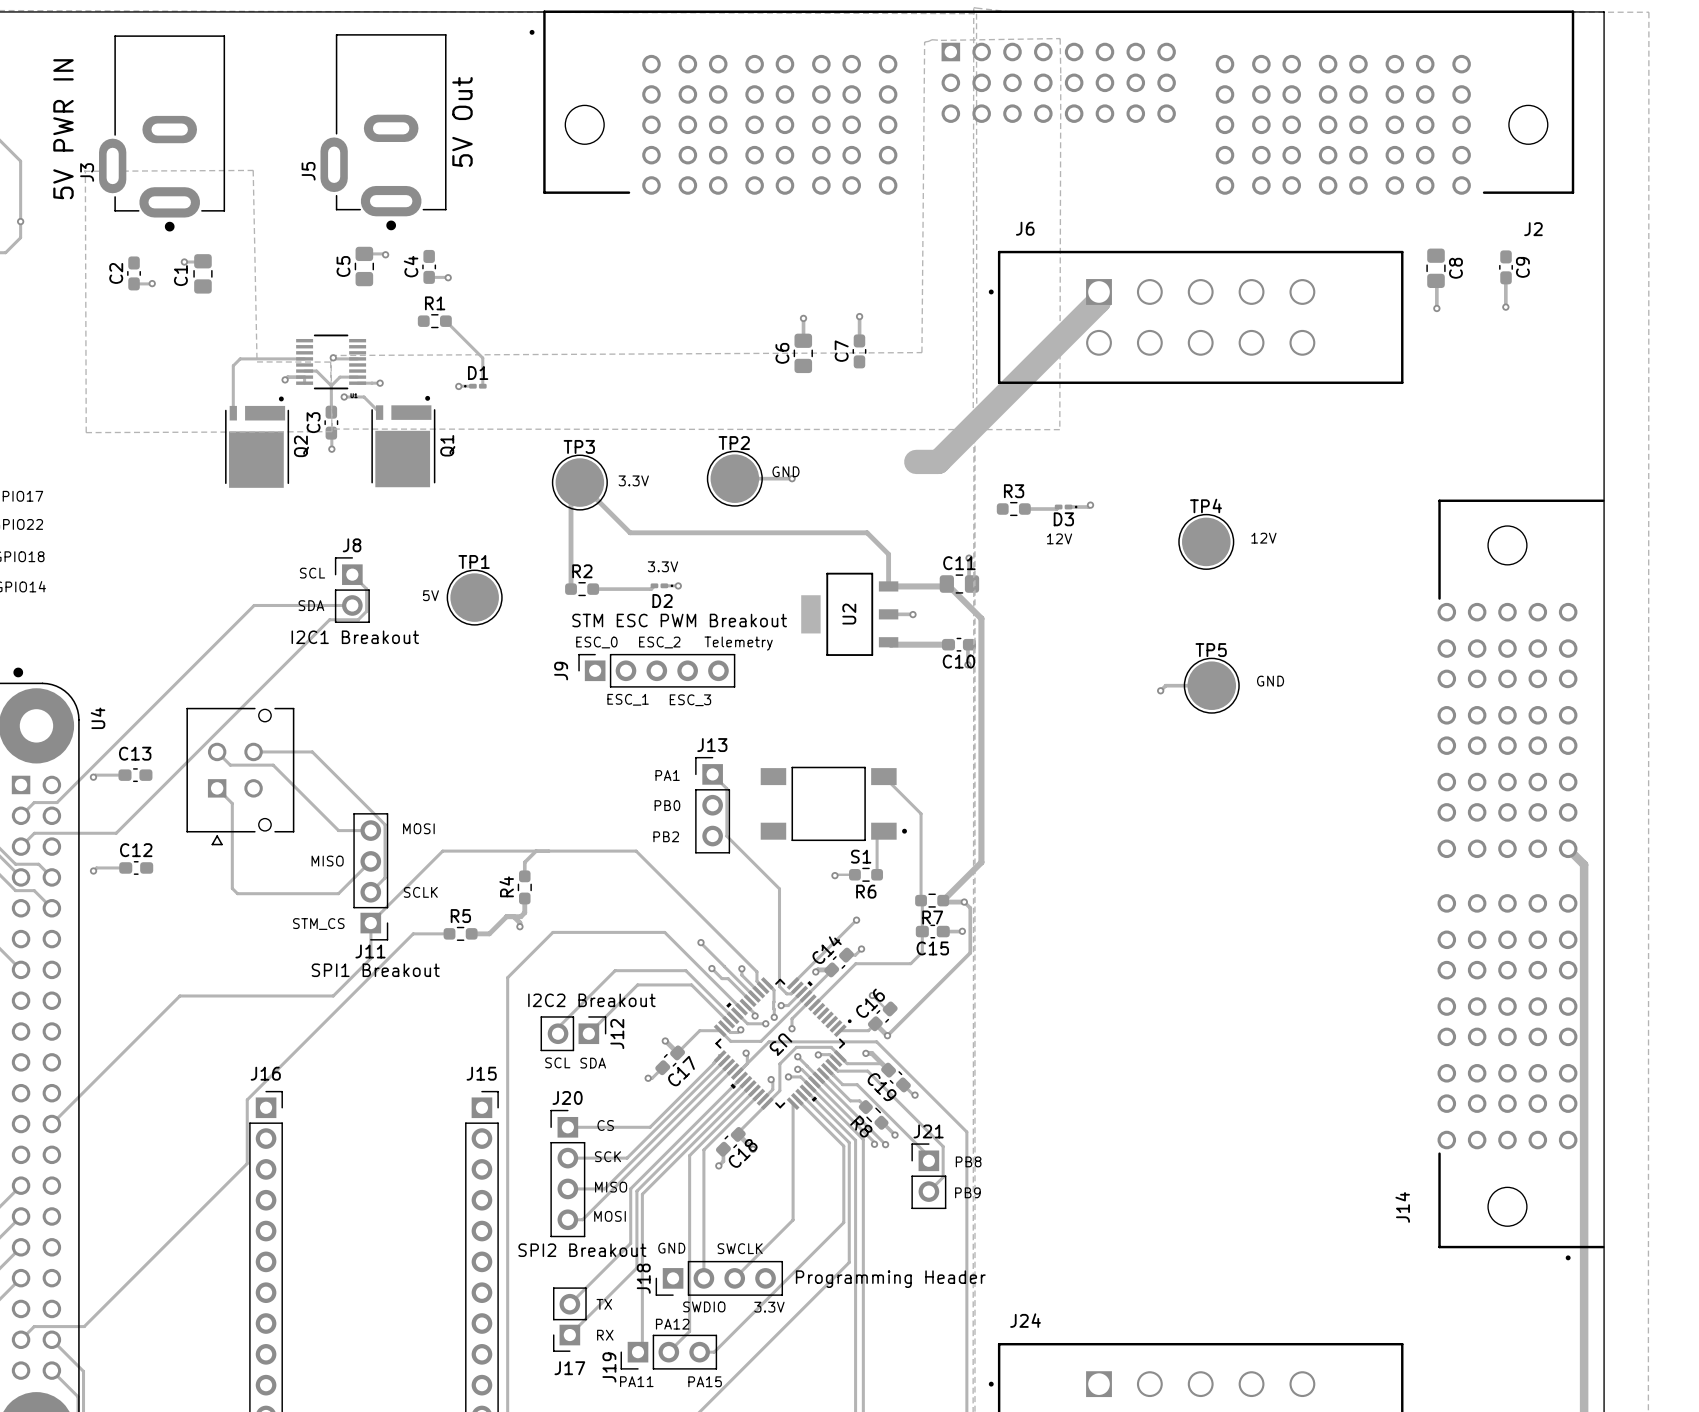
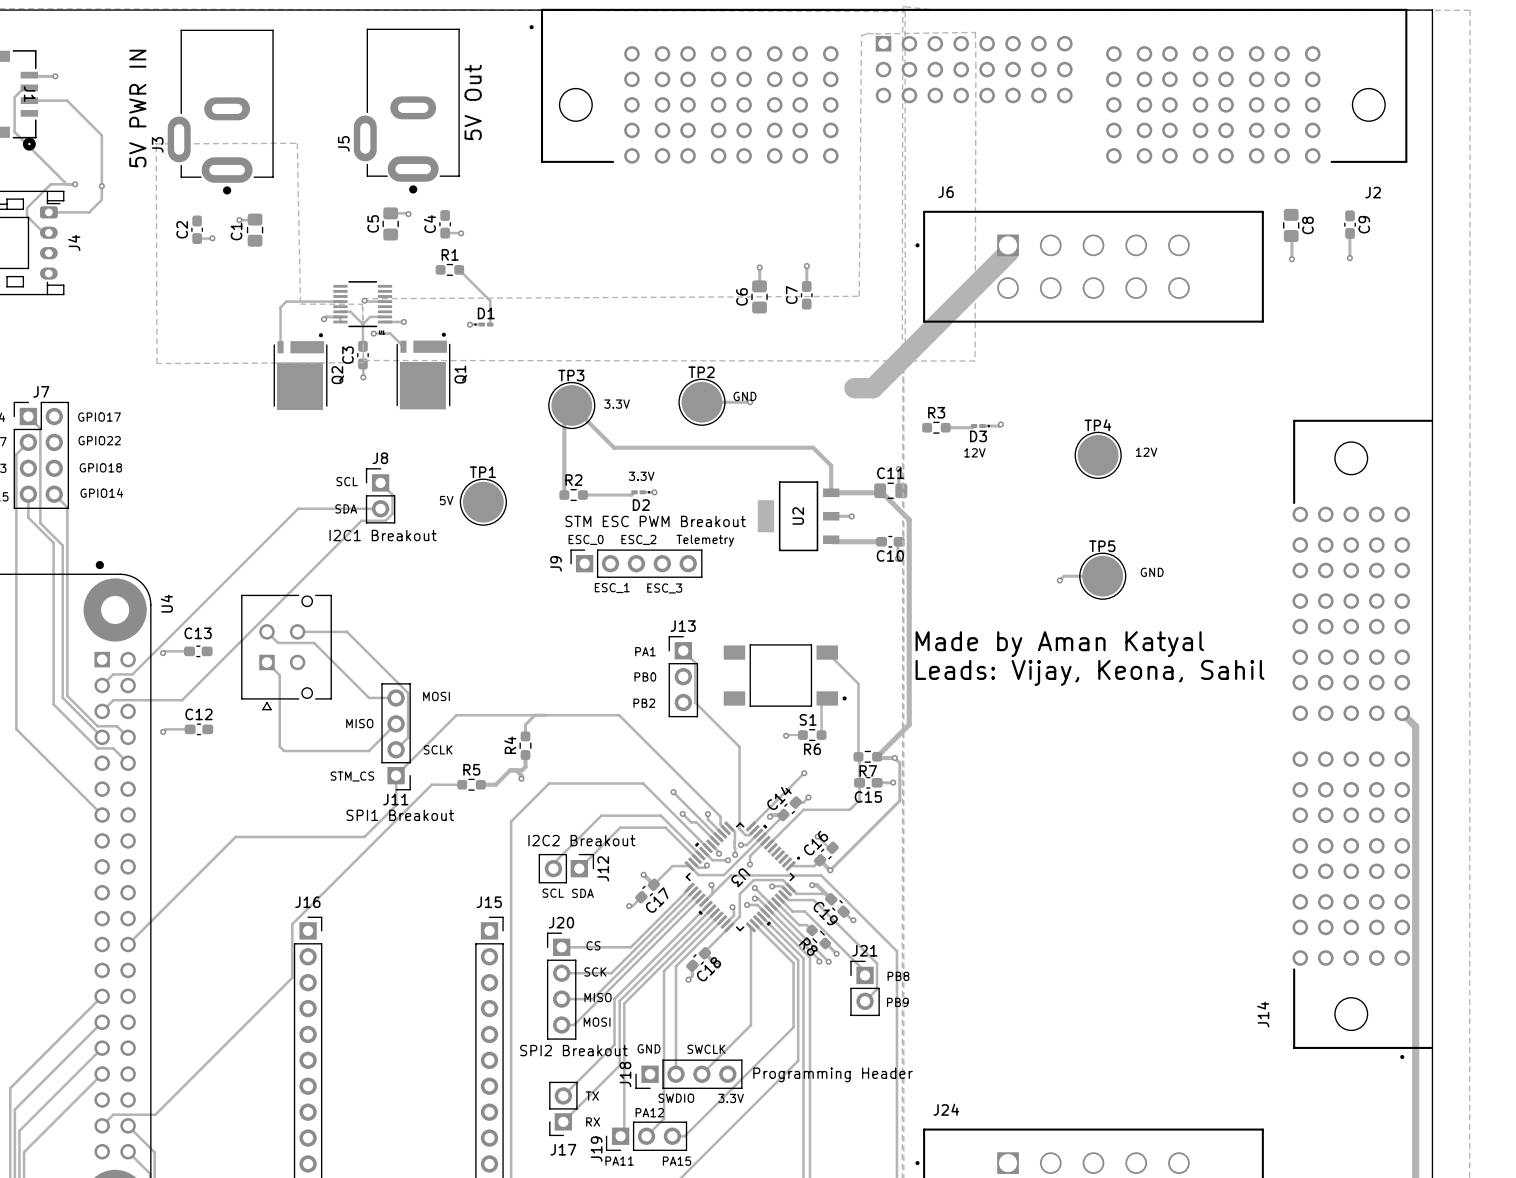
text: none -> Made by Aman Katyal (1059, 644)
text: none -> Leads: Vijay, Keona, Sahil (1090, 672)

